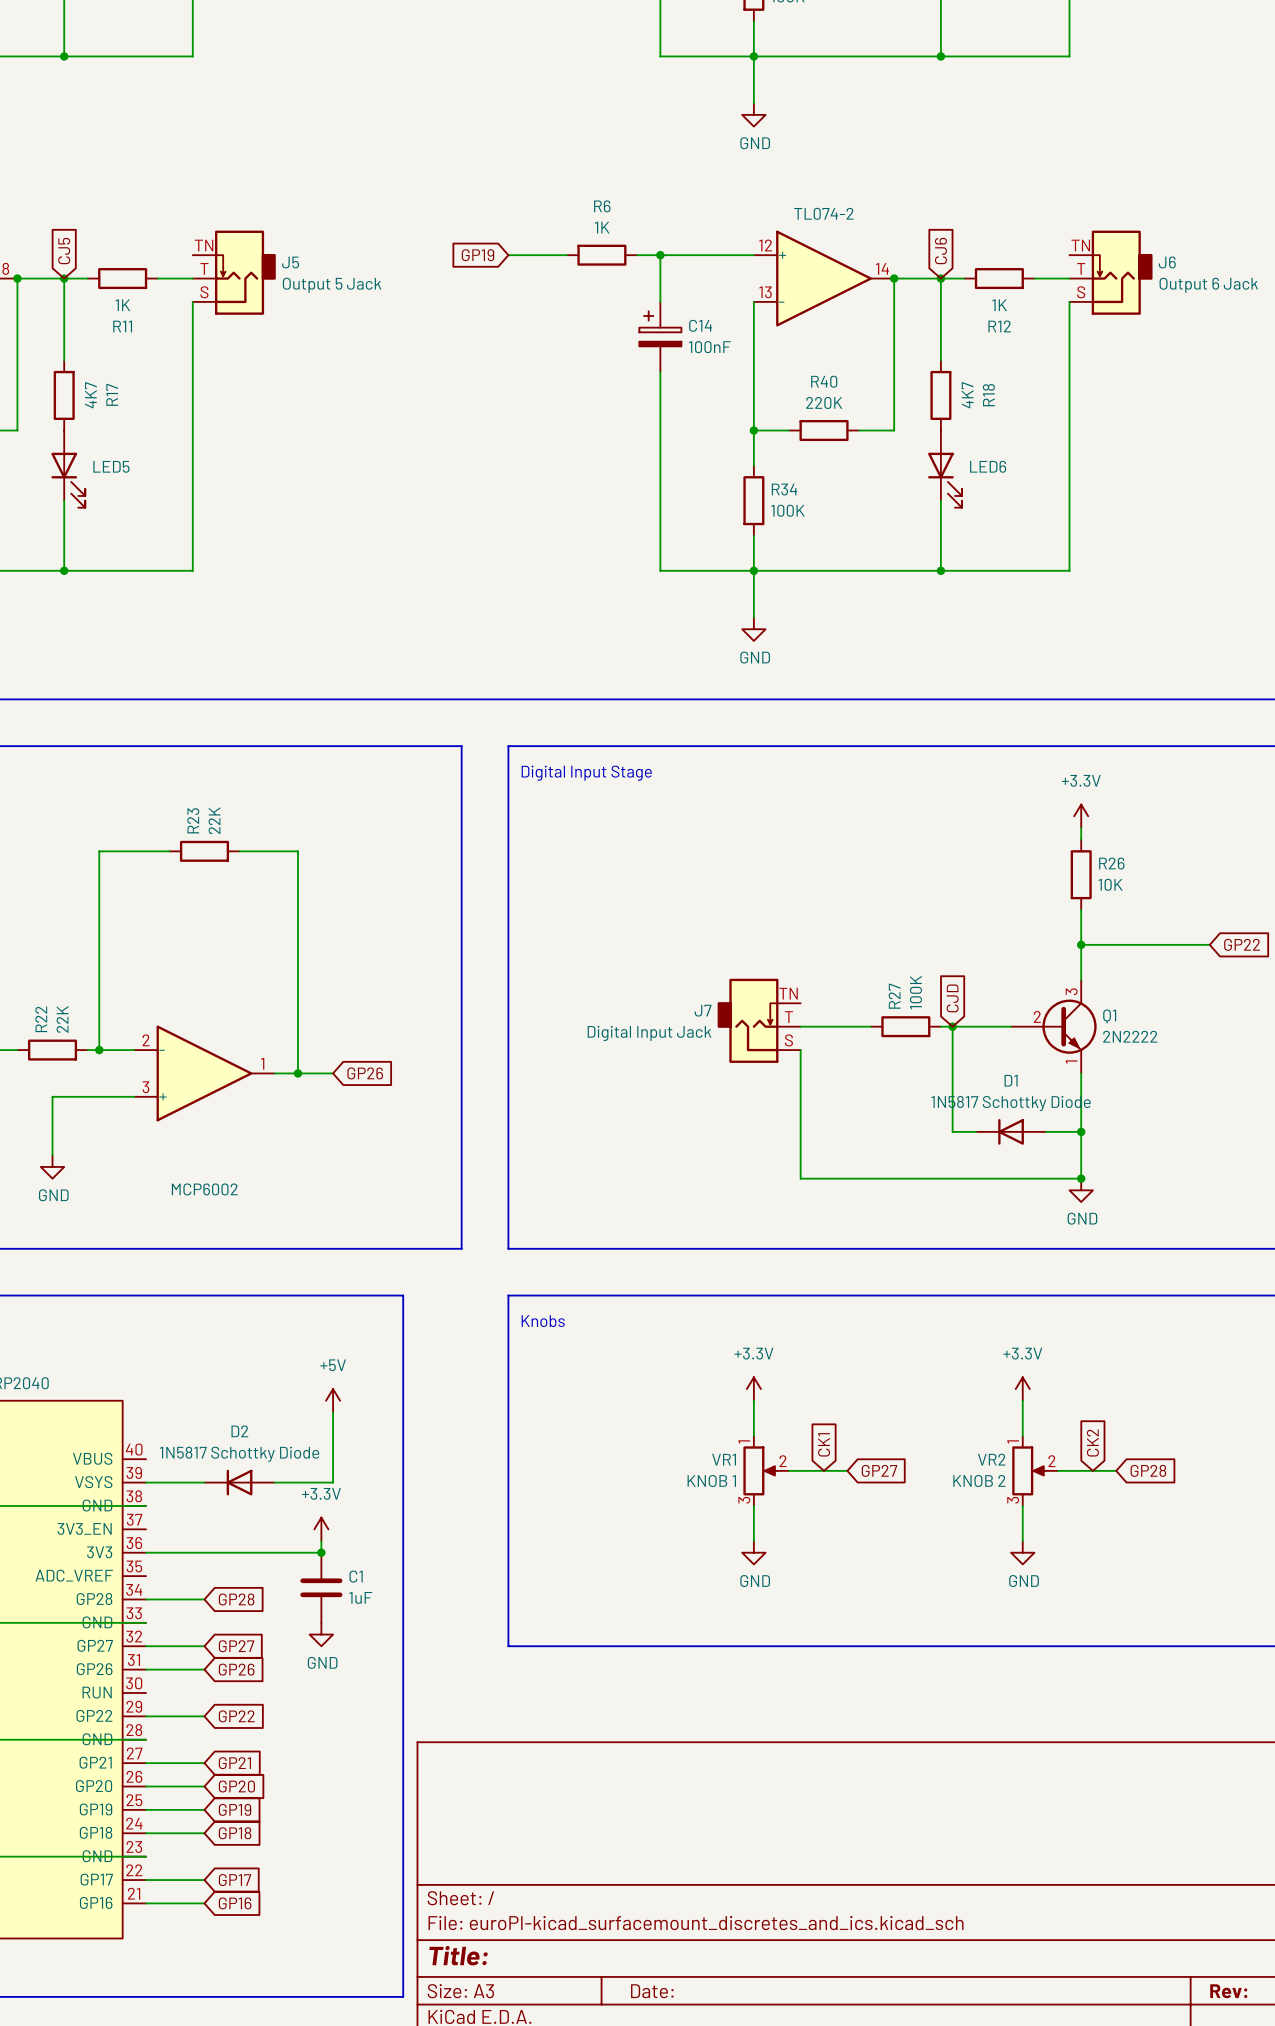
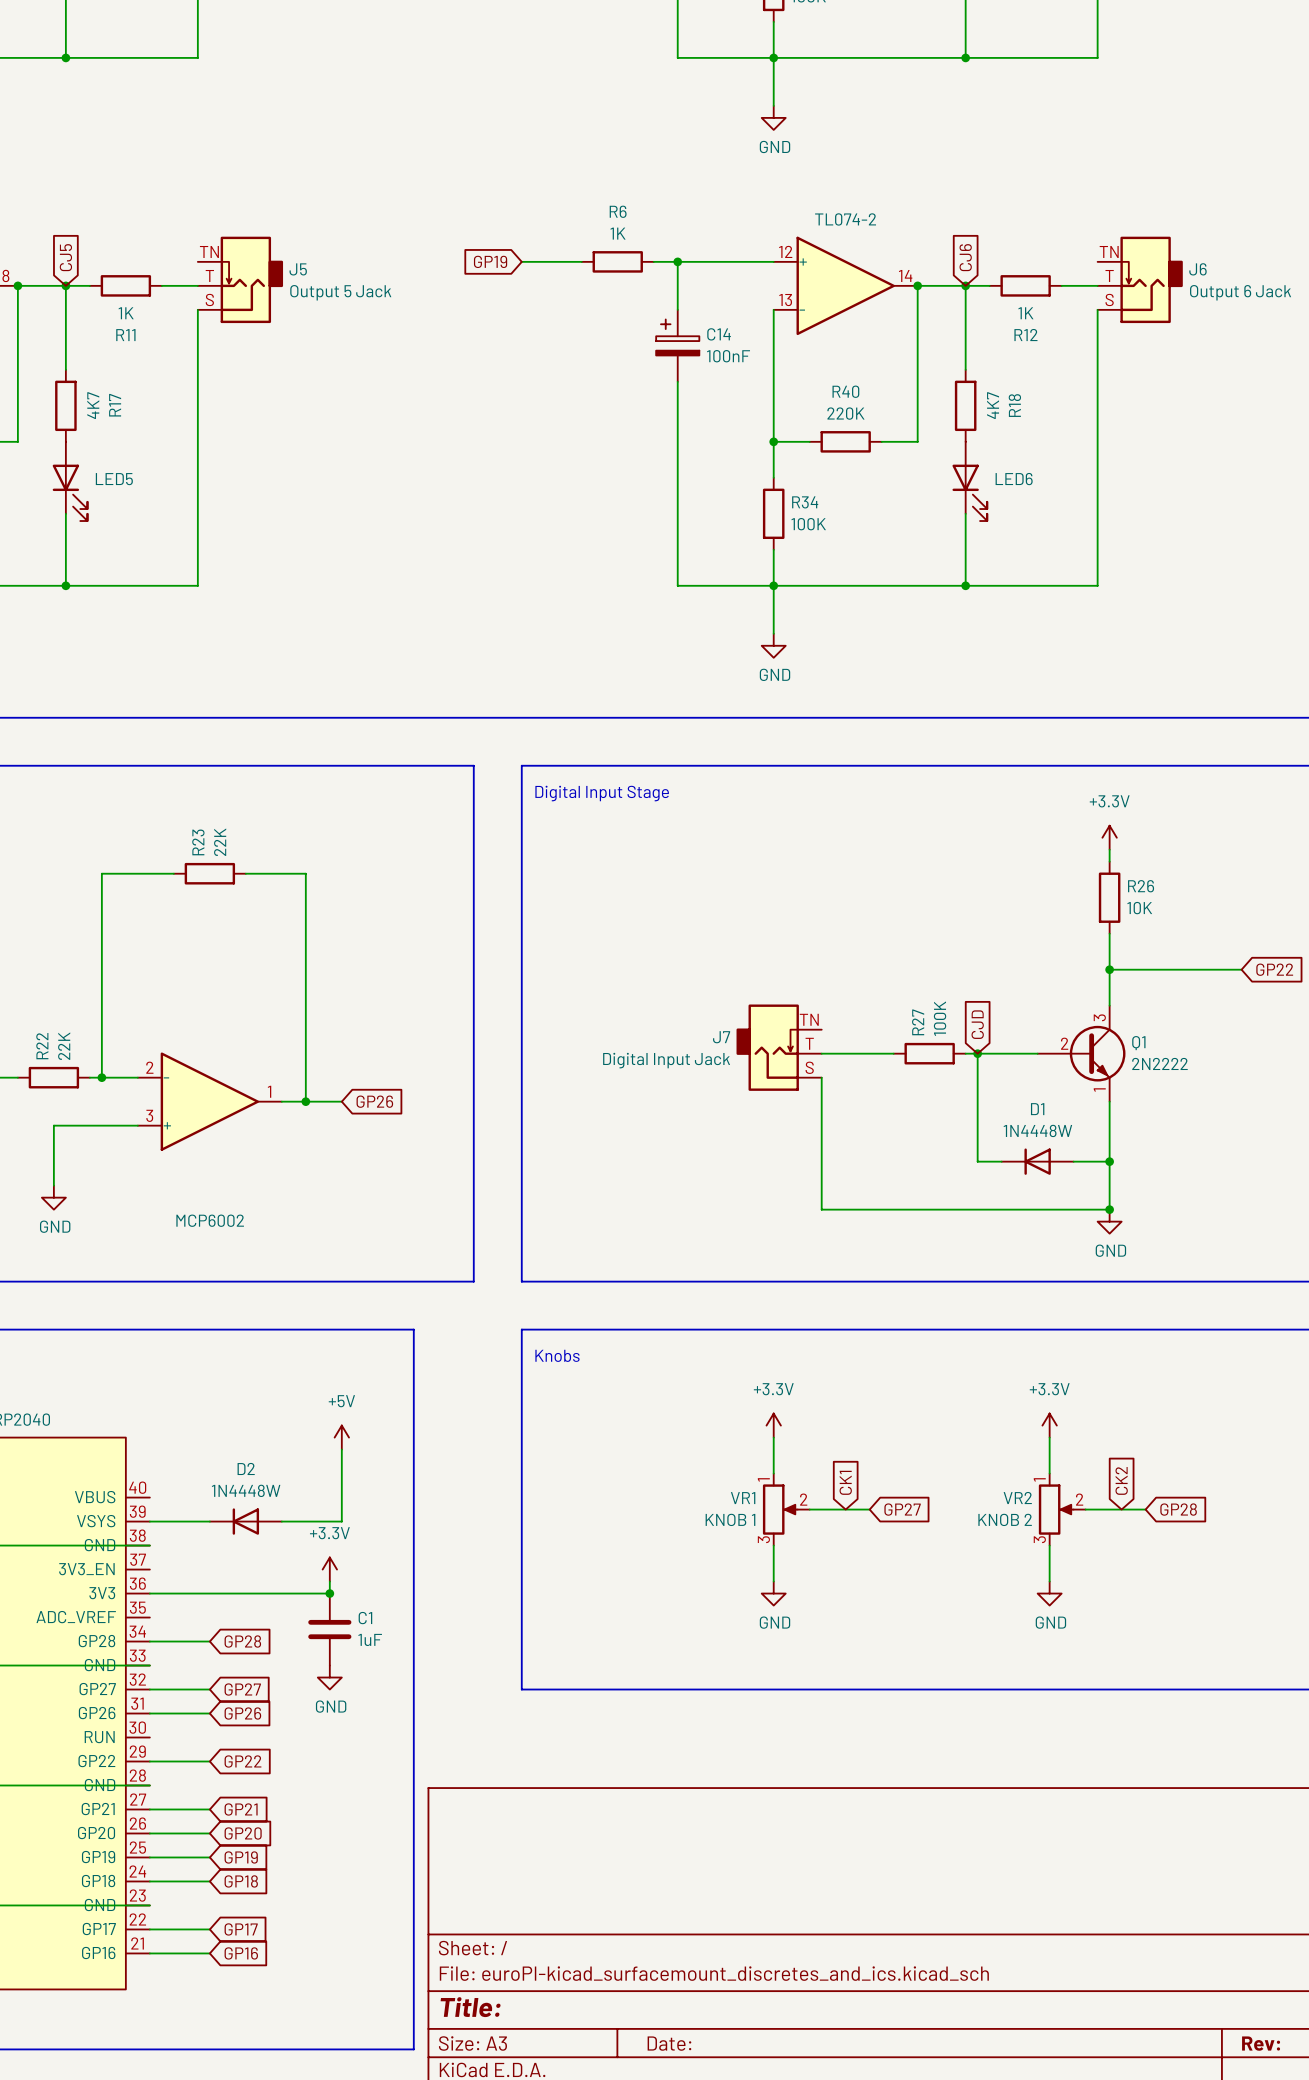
D1 value: 1N5817 Schottky Diode (1011, 1103) -> 1N4448W (1037, 1130)
D2 value: 1N5817 Schottky Diode (239, 1454) -> 1N4448W (246, 1490)

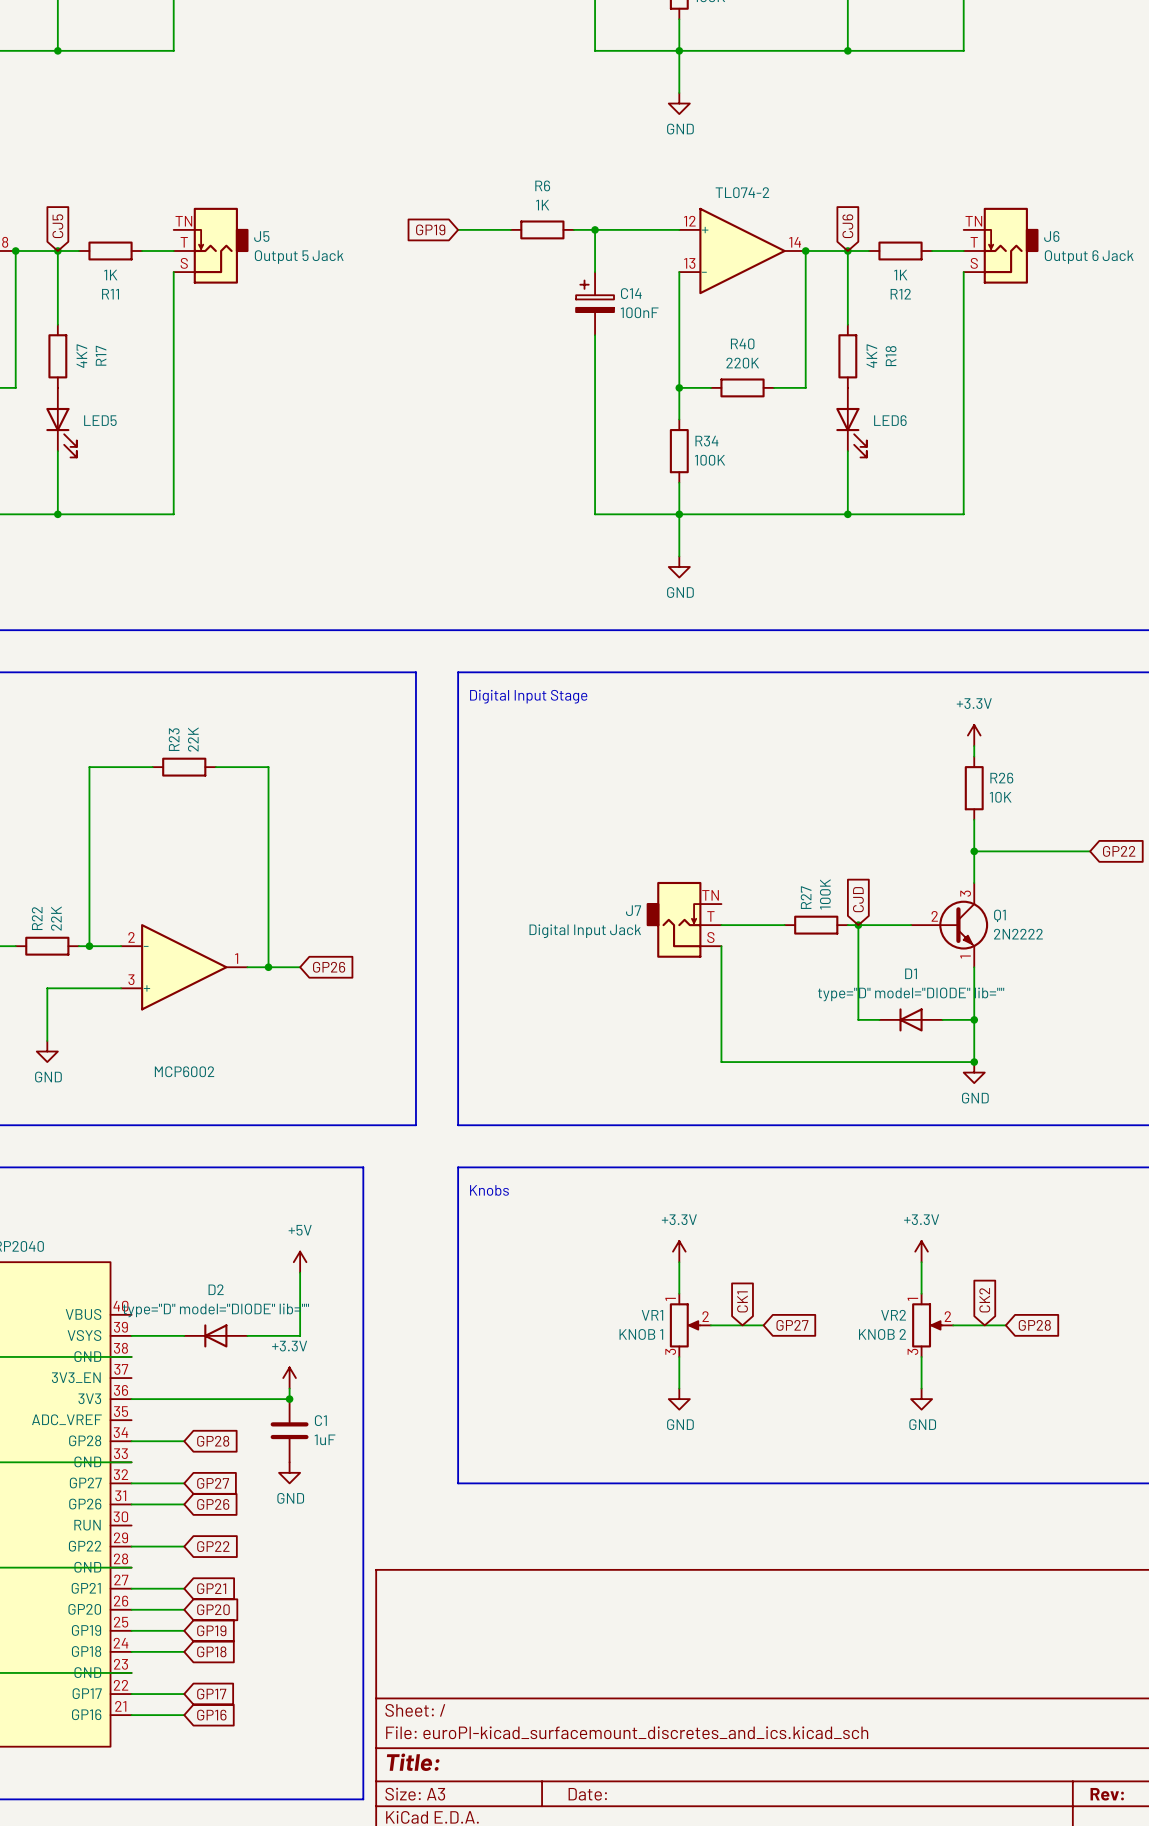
D1 value: 1N4448W (1037, 1130) -> type="D" model="DIODE" lib="" (911, 994)
D2 value: 1N4448W (246, 1490) -> type="D" model="DIODE" lib="" (215, 1310)

